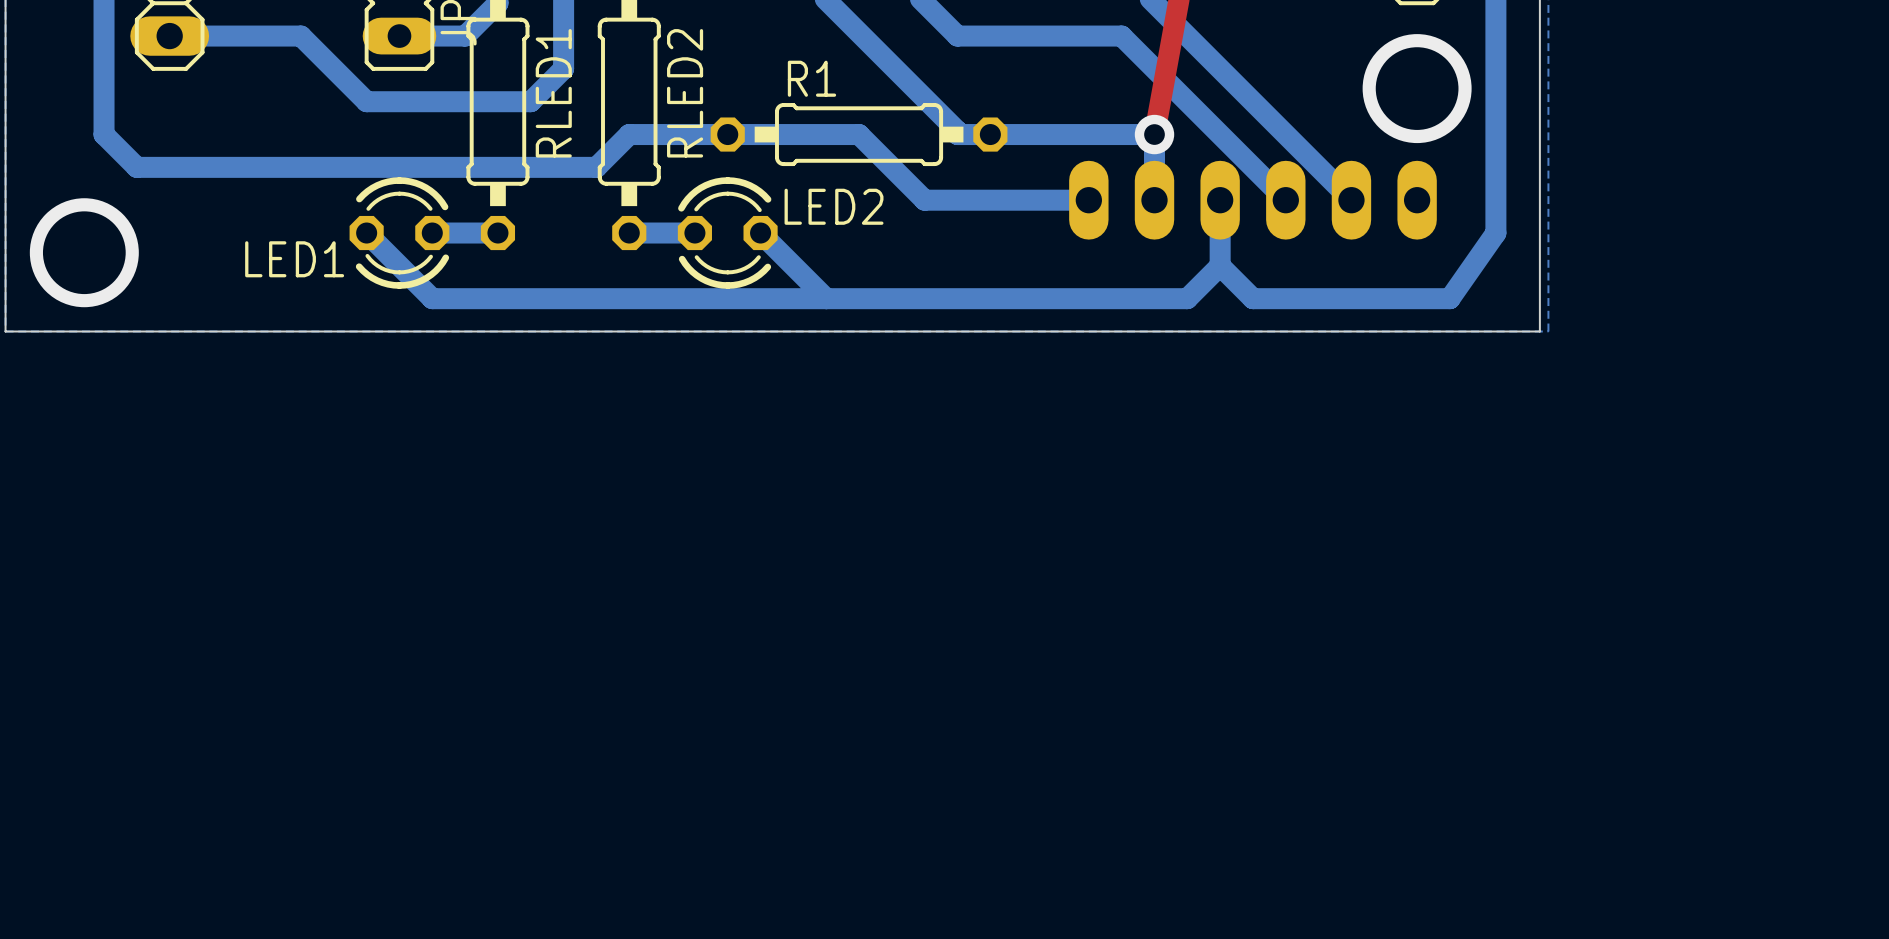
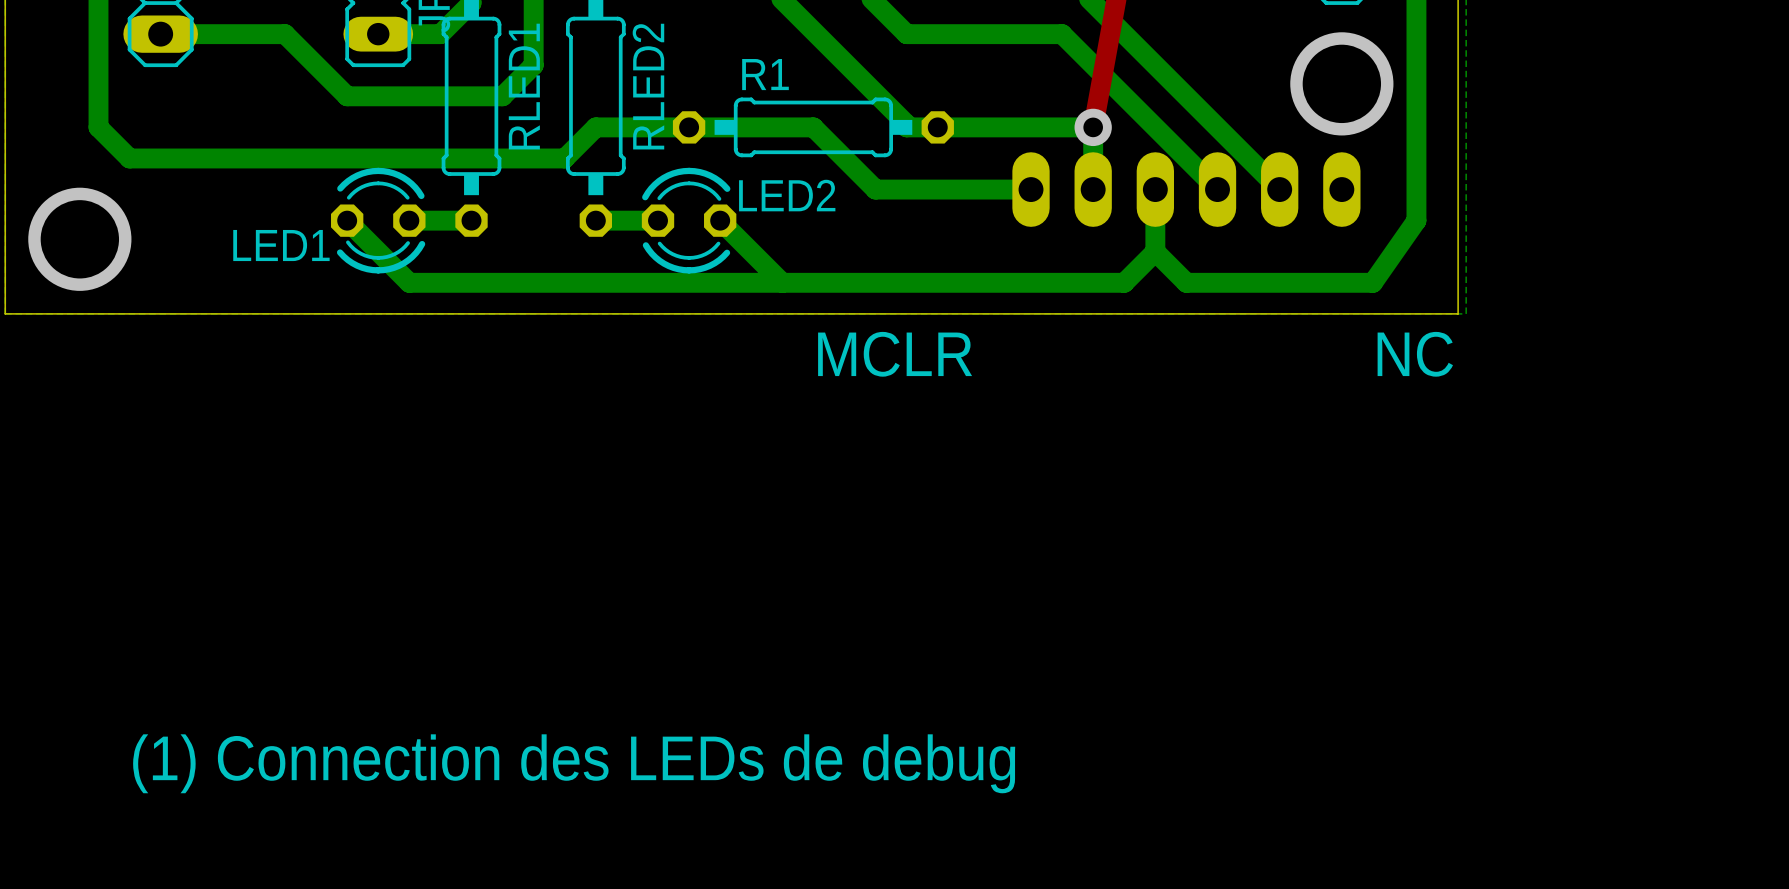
text: none -> MCLR (895, 354)
text: none -> NC (1415, 354)
text: none -> (1) Connection des LEDs de debug (574, 763)

